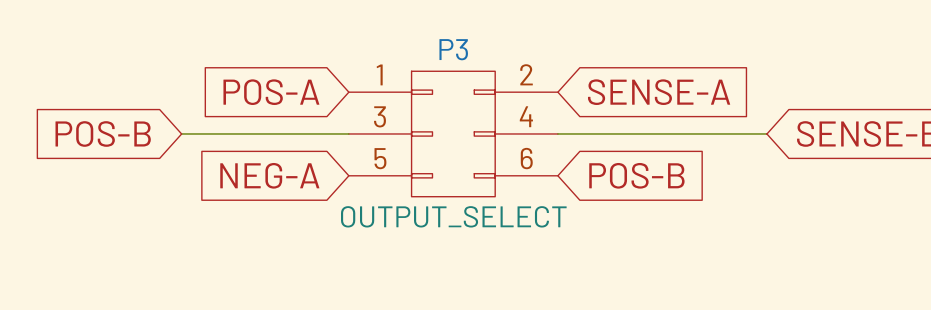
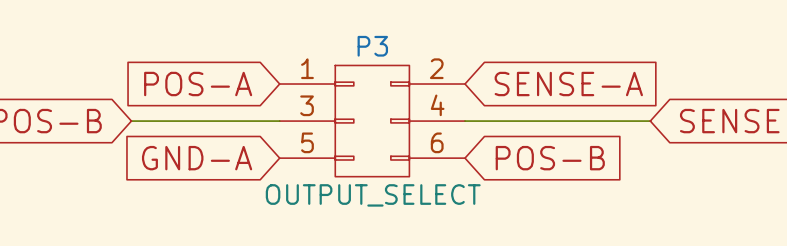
global label: NEG-A (269, 175) -> GND-A (197, 158)

